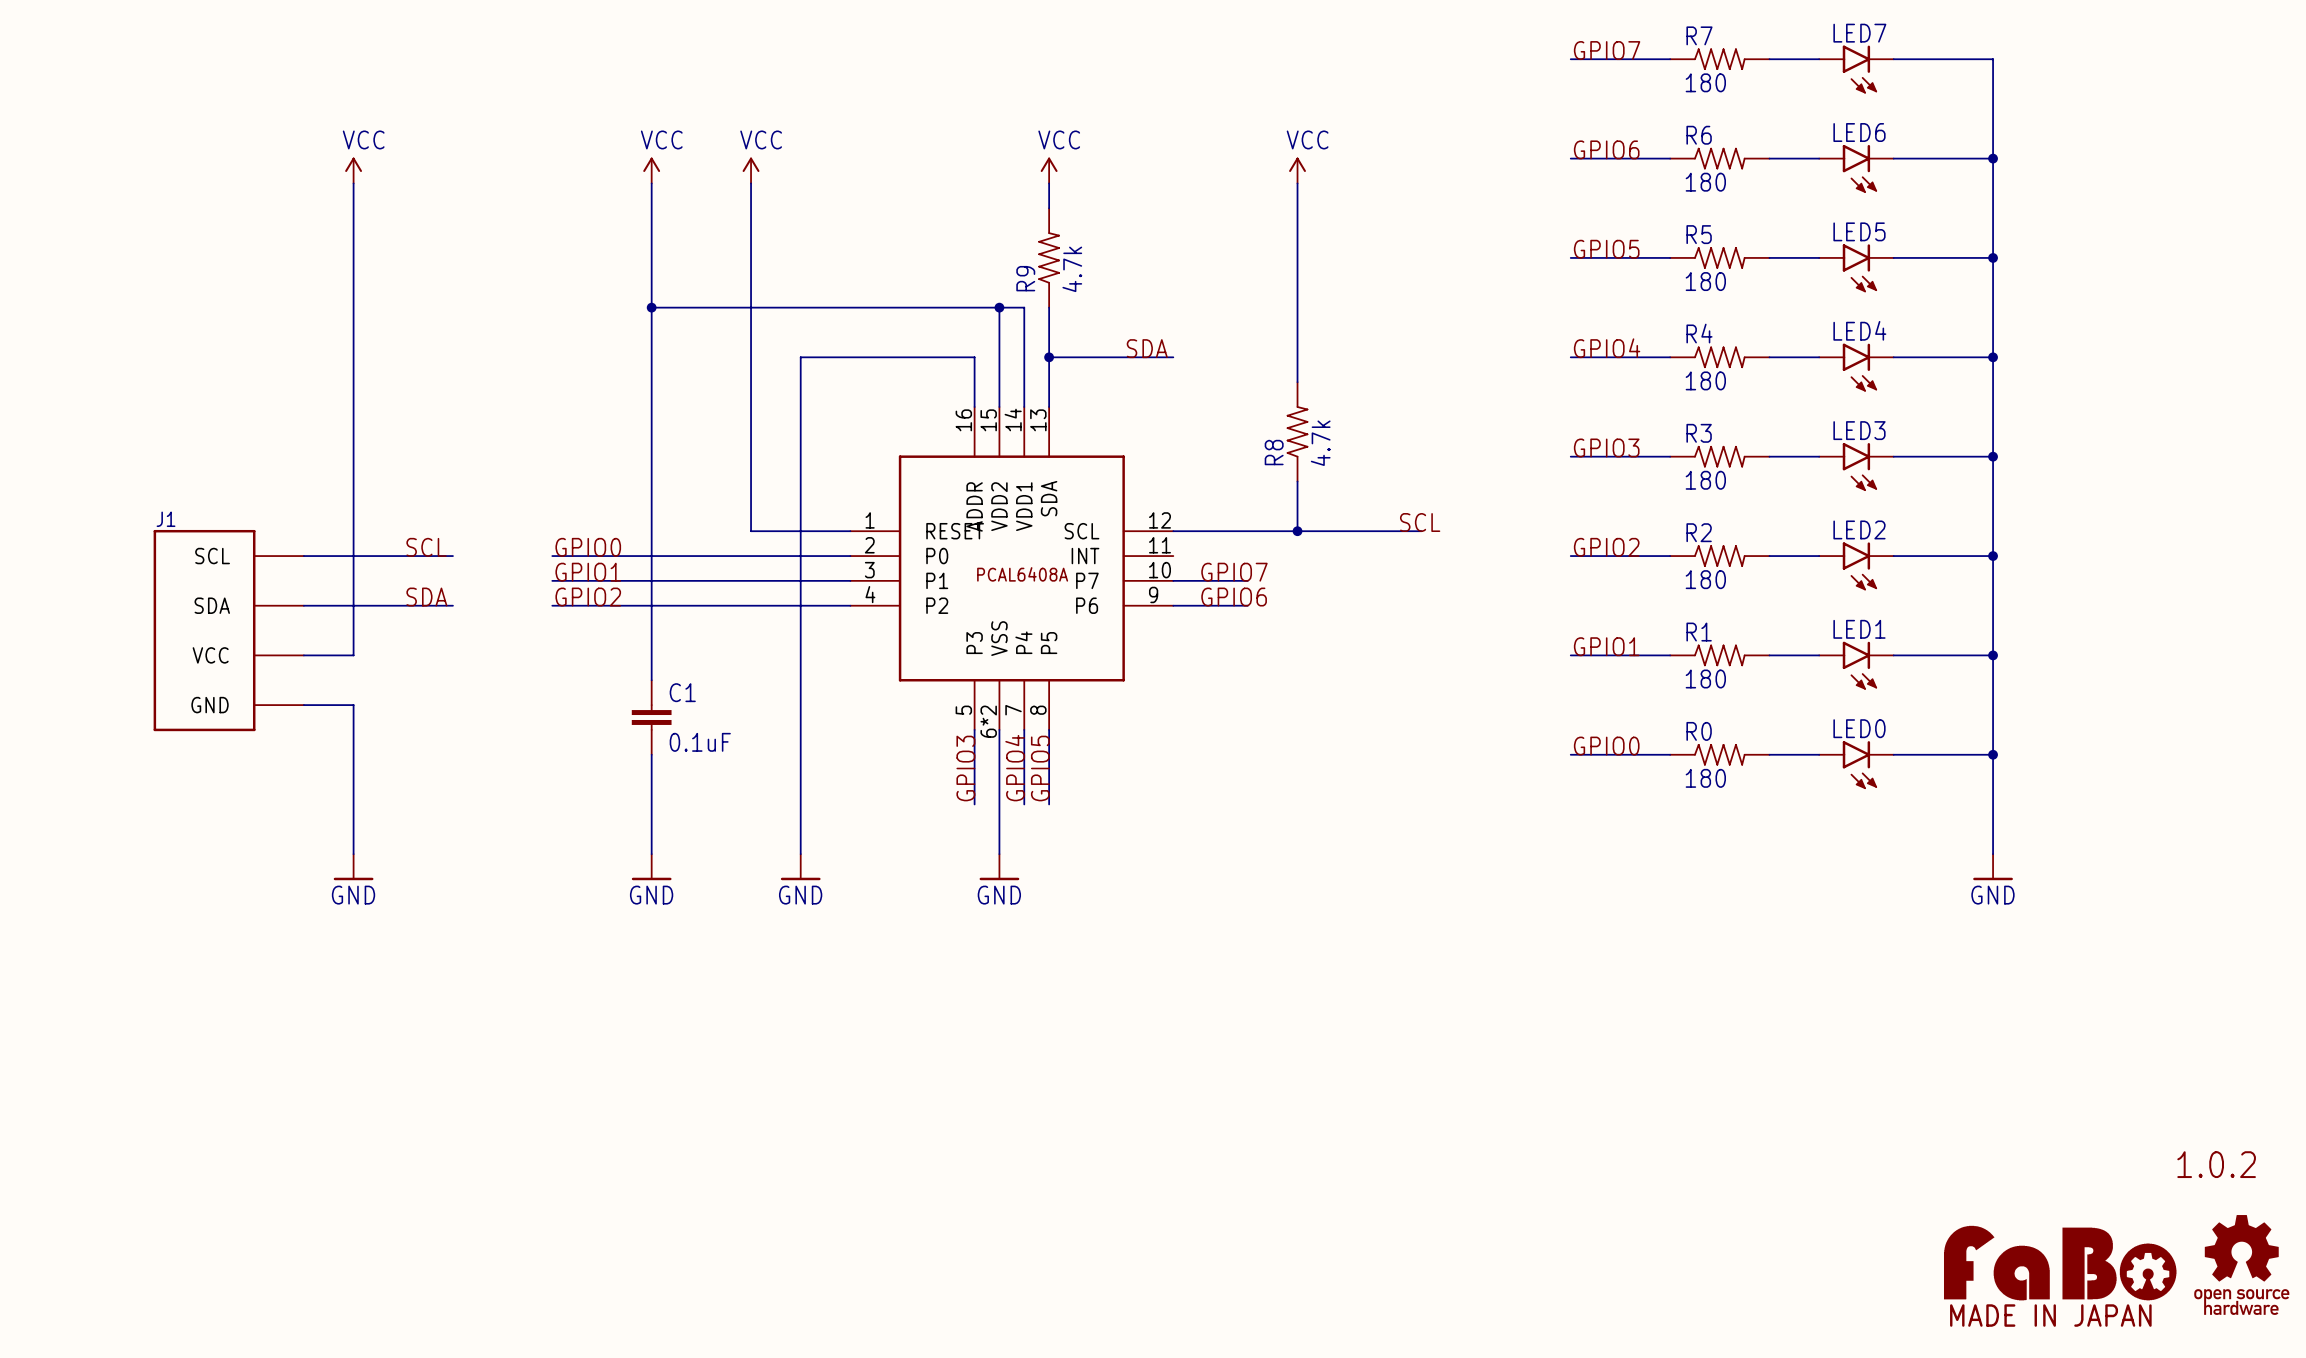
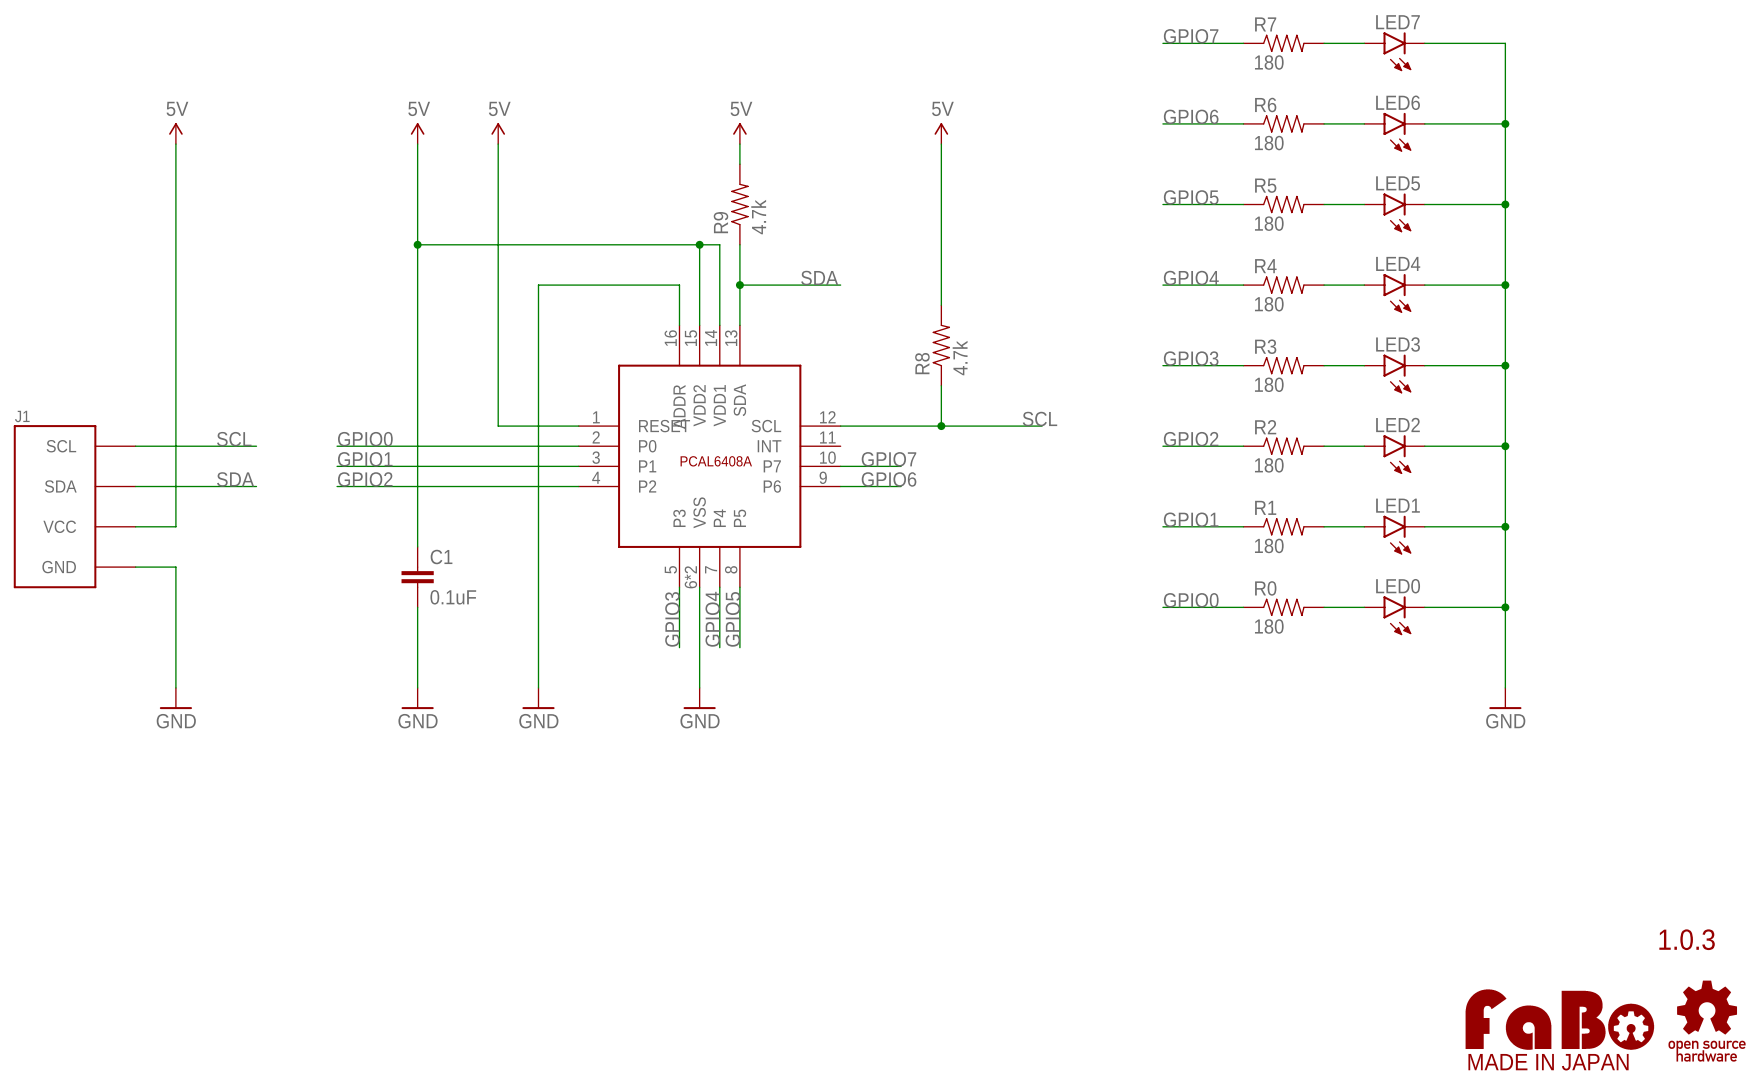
power symbol: VCC (353, 170) -> 5V (175, 133)
power symbol: VCC (651, 170) -> 5V (417, 133)
power symbol: VCC (751, 170) -> 5V (498, 133)
power symbol: VCC (1049, 170) -> 5V (739, 133)
power symbol: VCC (1297, 170) -> 5V (941, 133)
text: 1.0.2 (2216, 1164) -> 1.0.3 (1687, 939)

